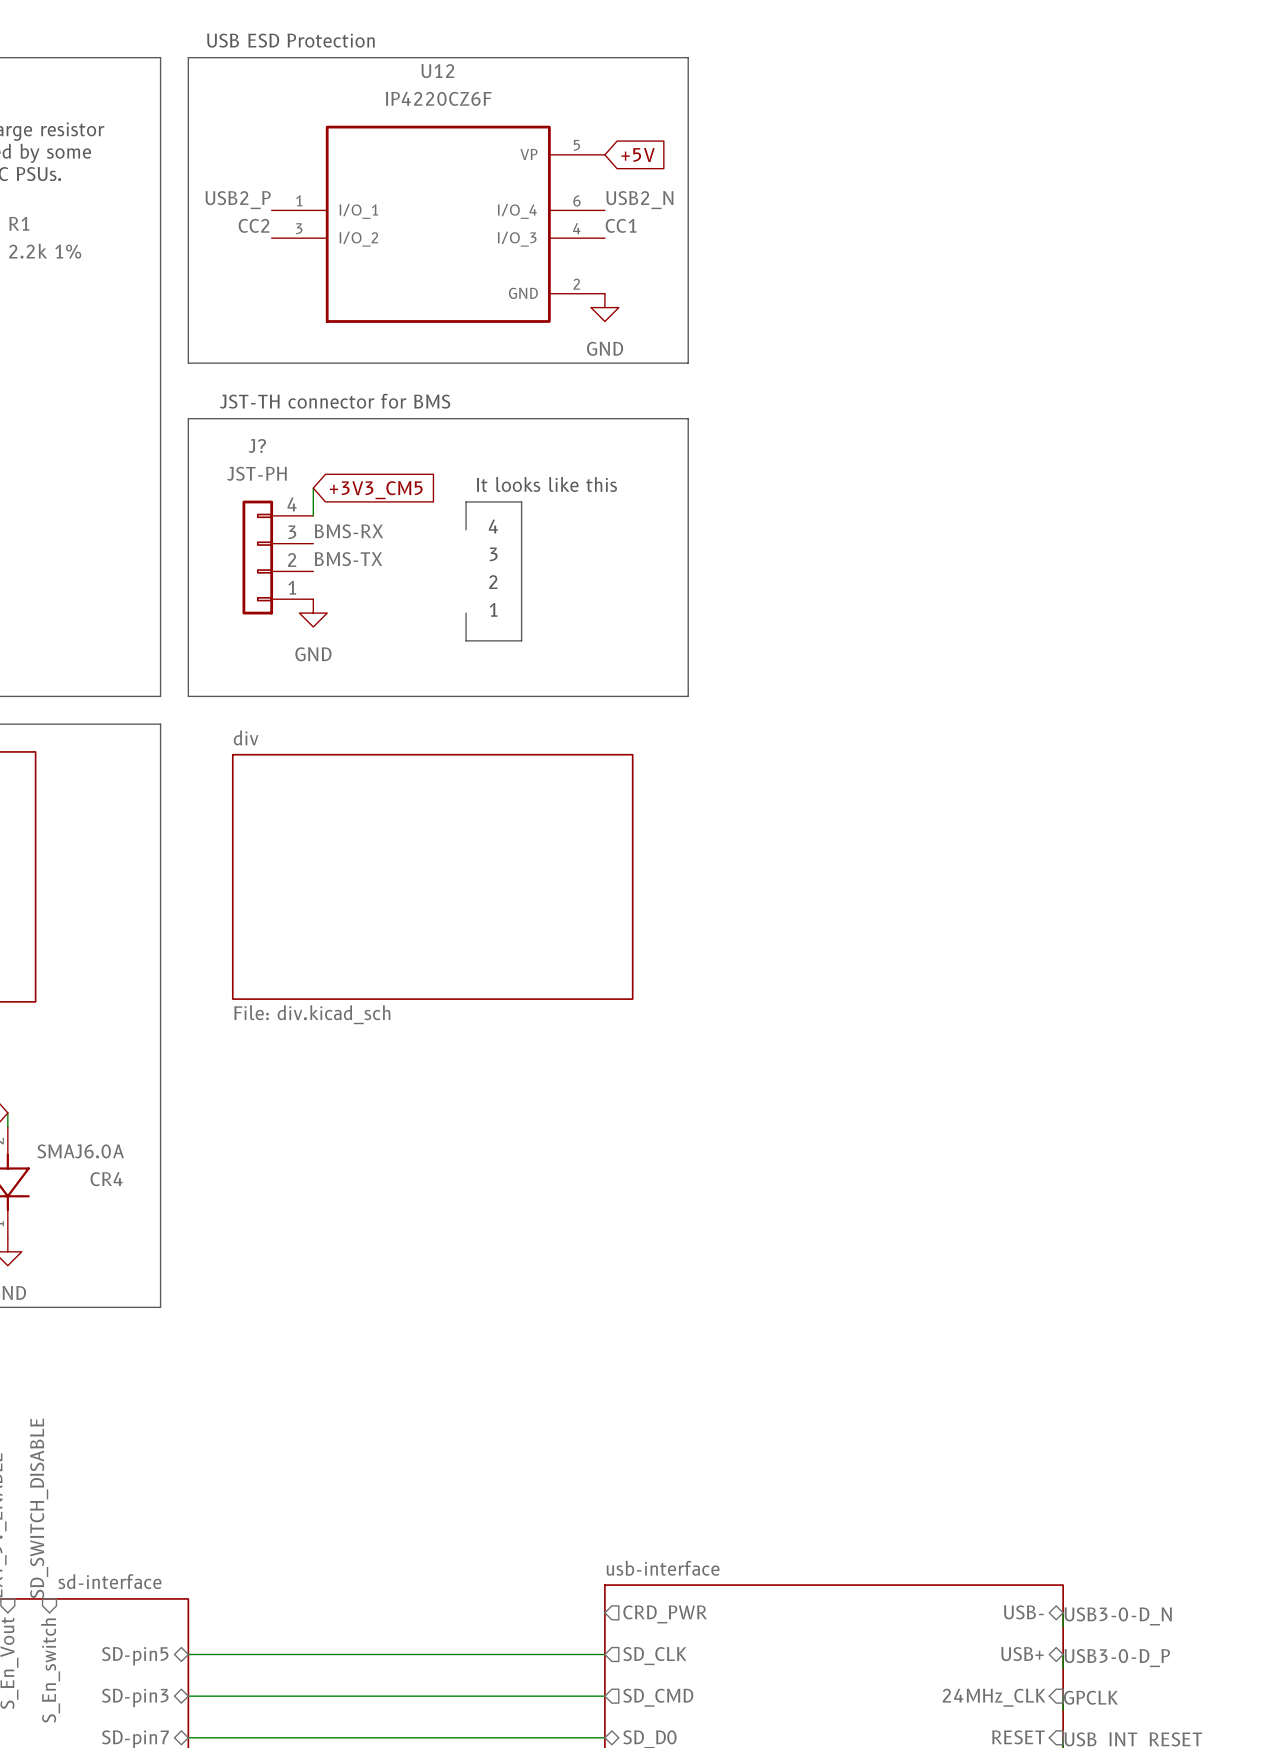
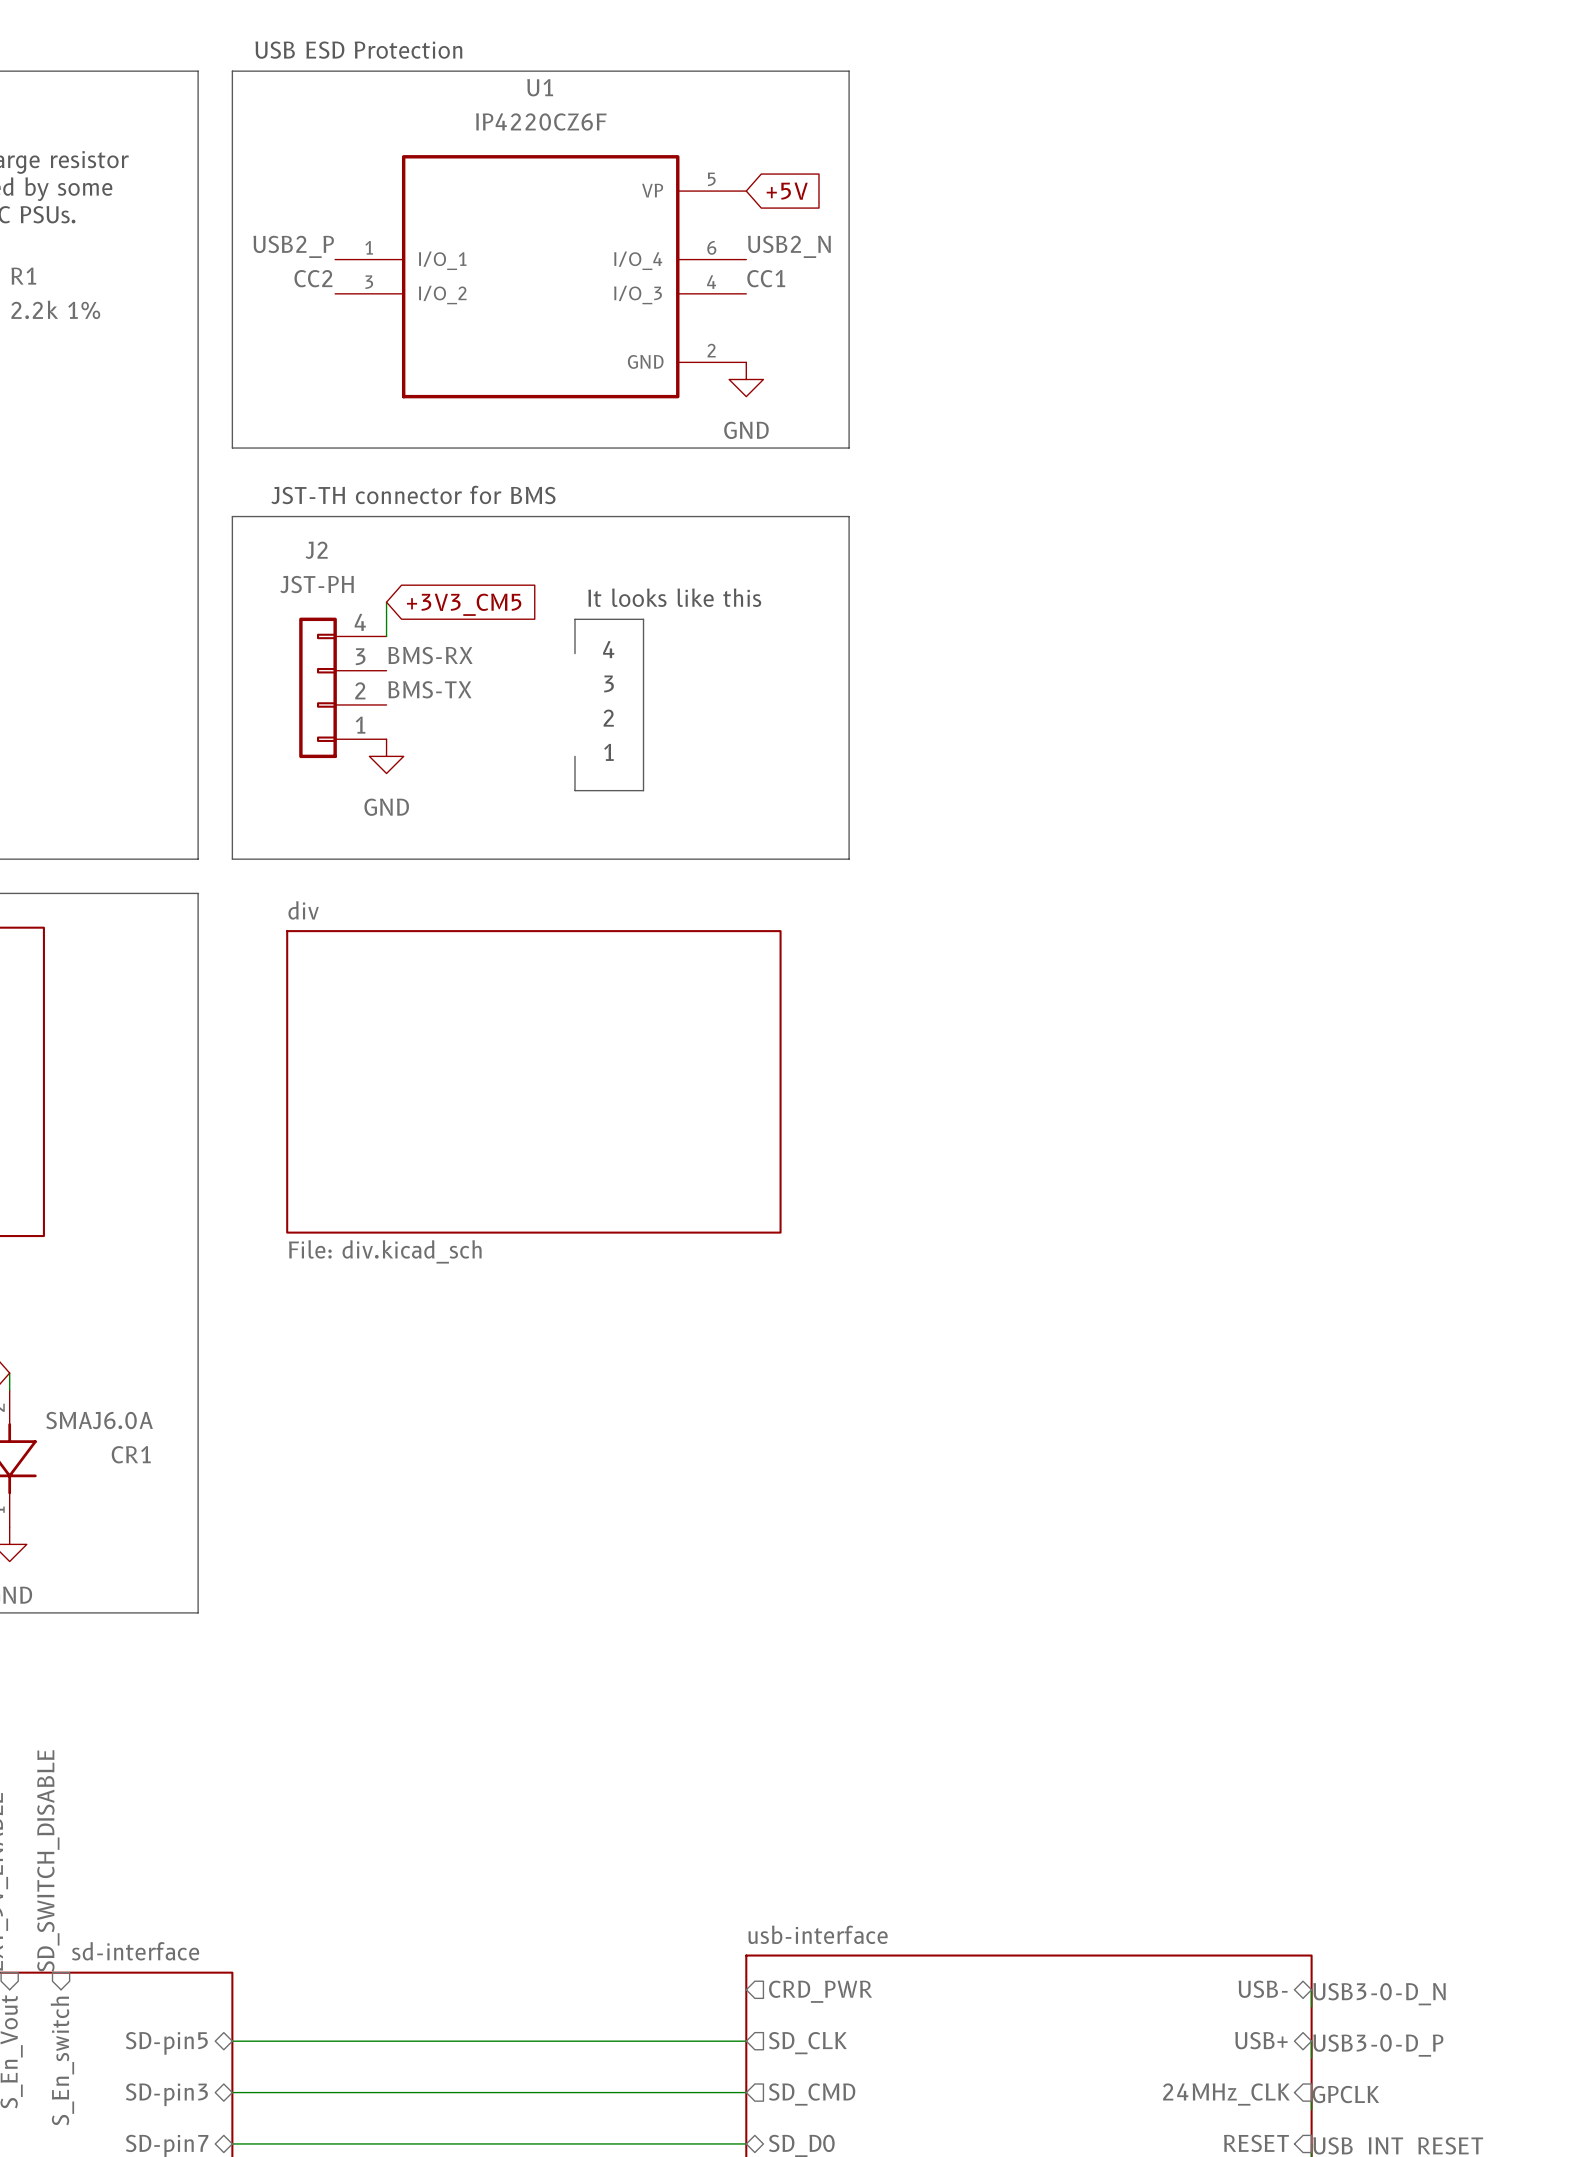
U12 name: U12 (437, 71) -> U1 (540, 87)
J? name: J? (257, 446) -> J2 (316, 550)
CR4 name: CR4 (106, 1179) -> CR1 (131, 1454)

